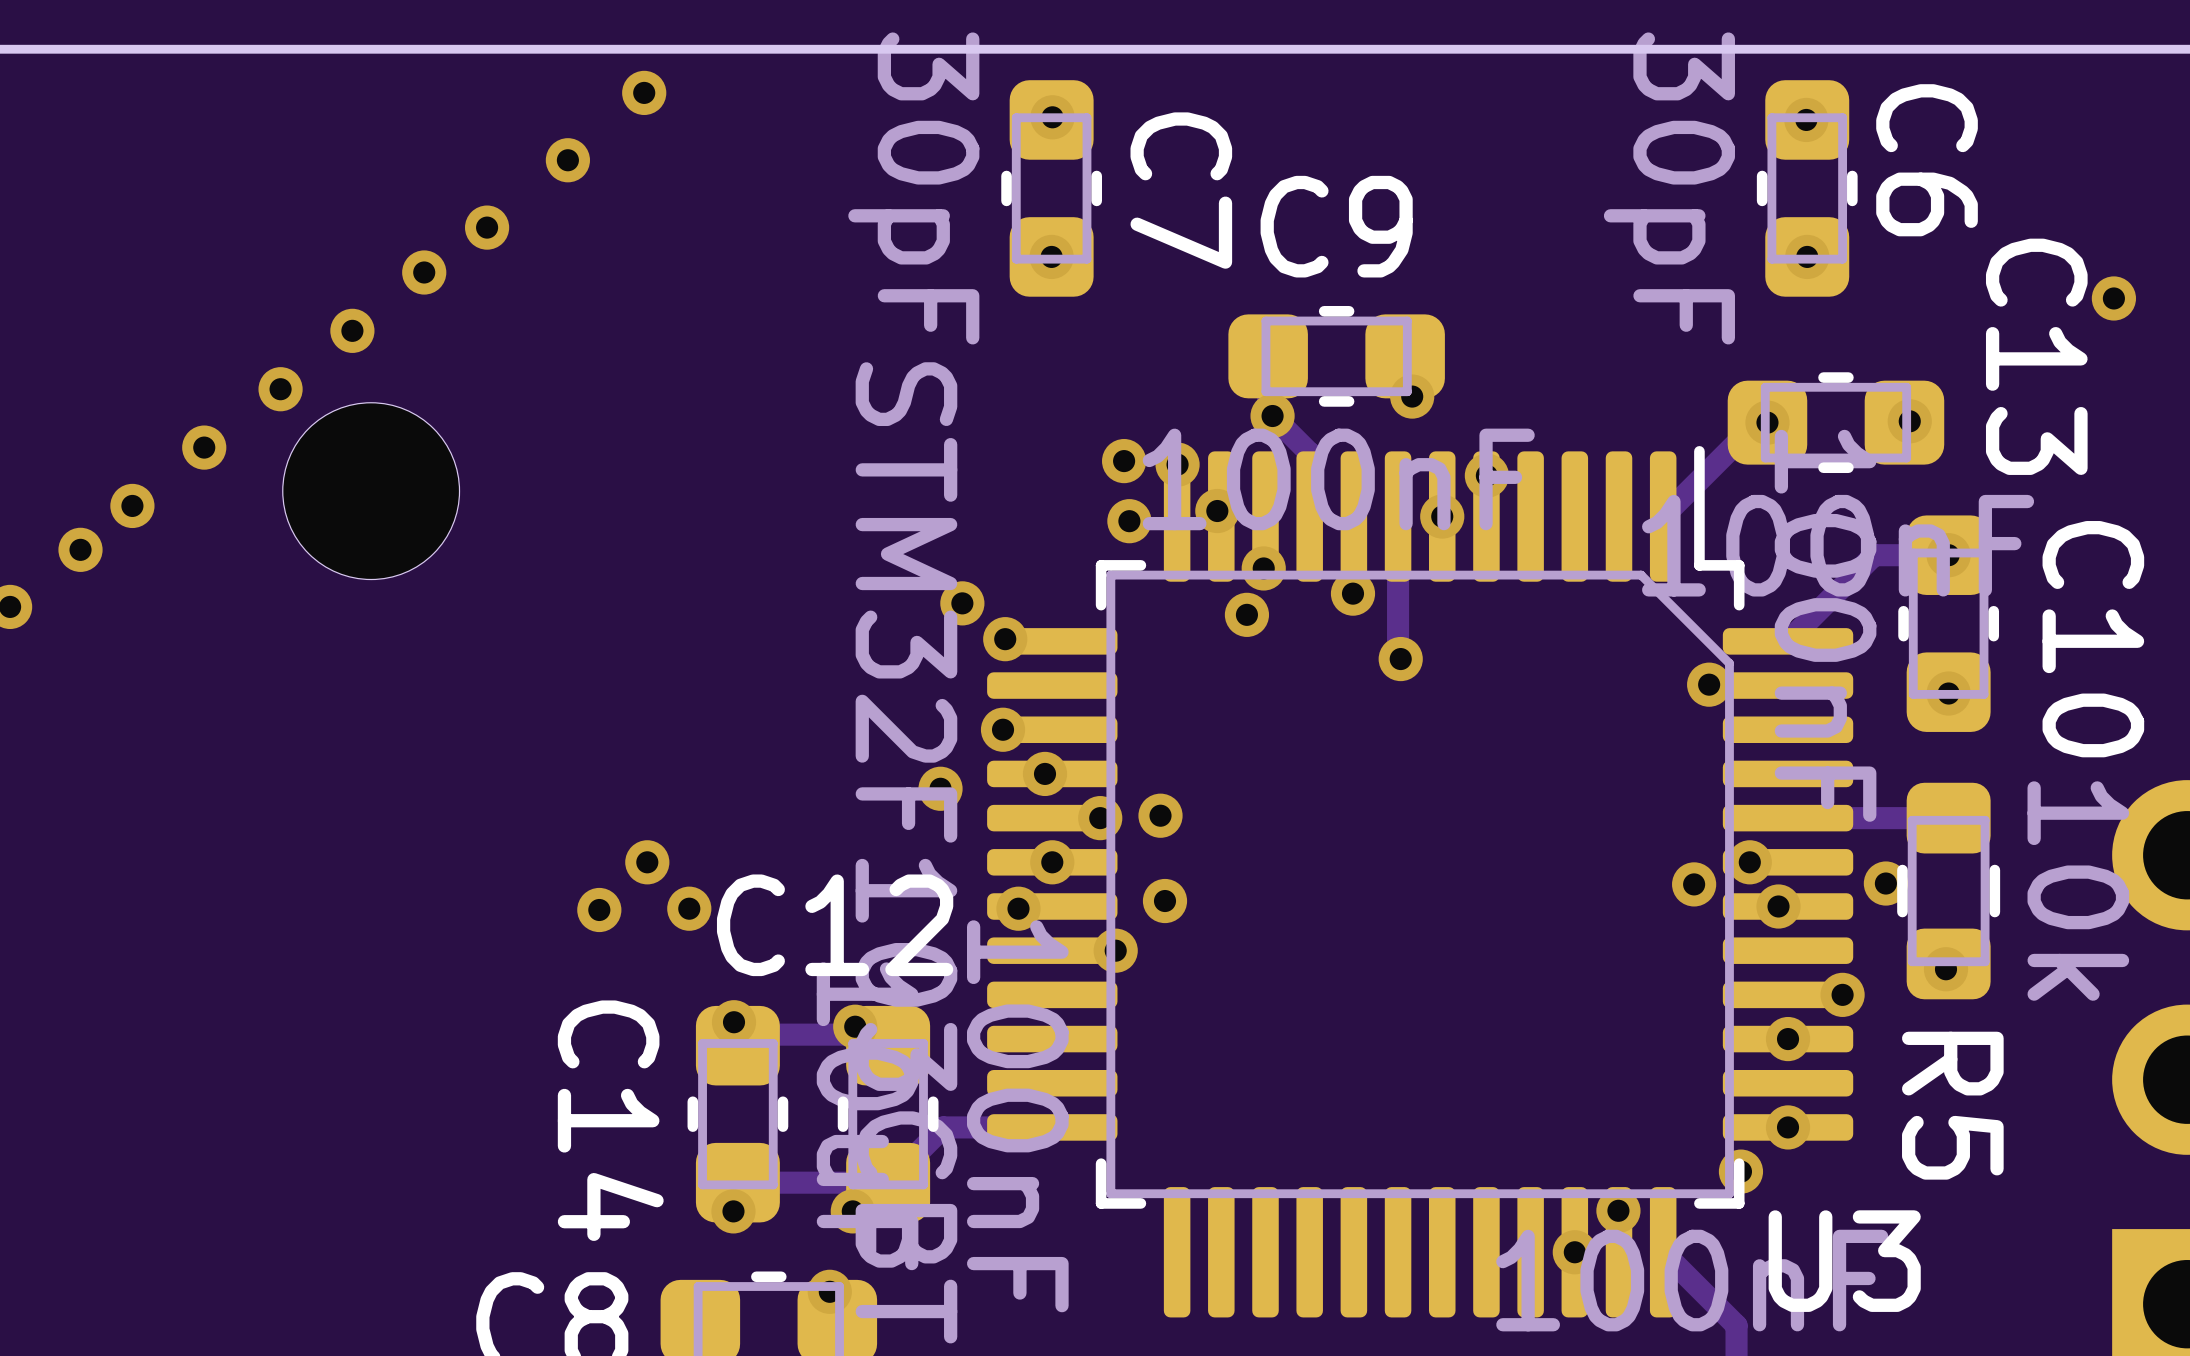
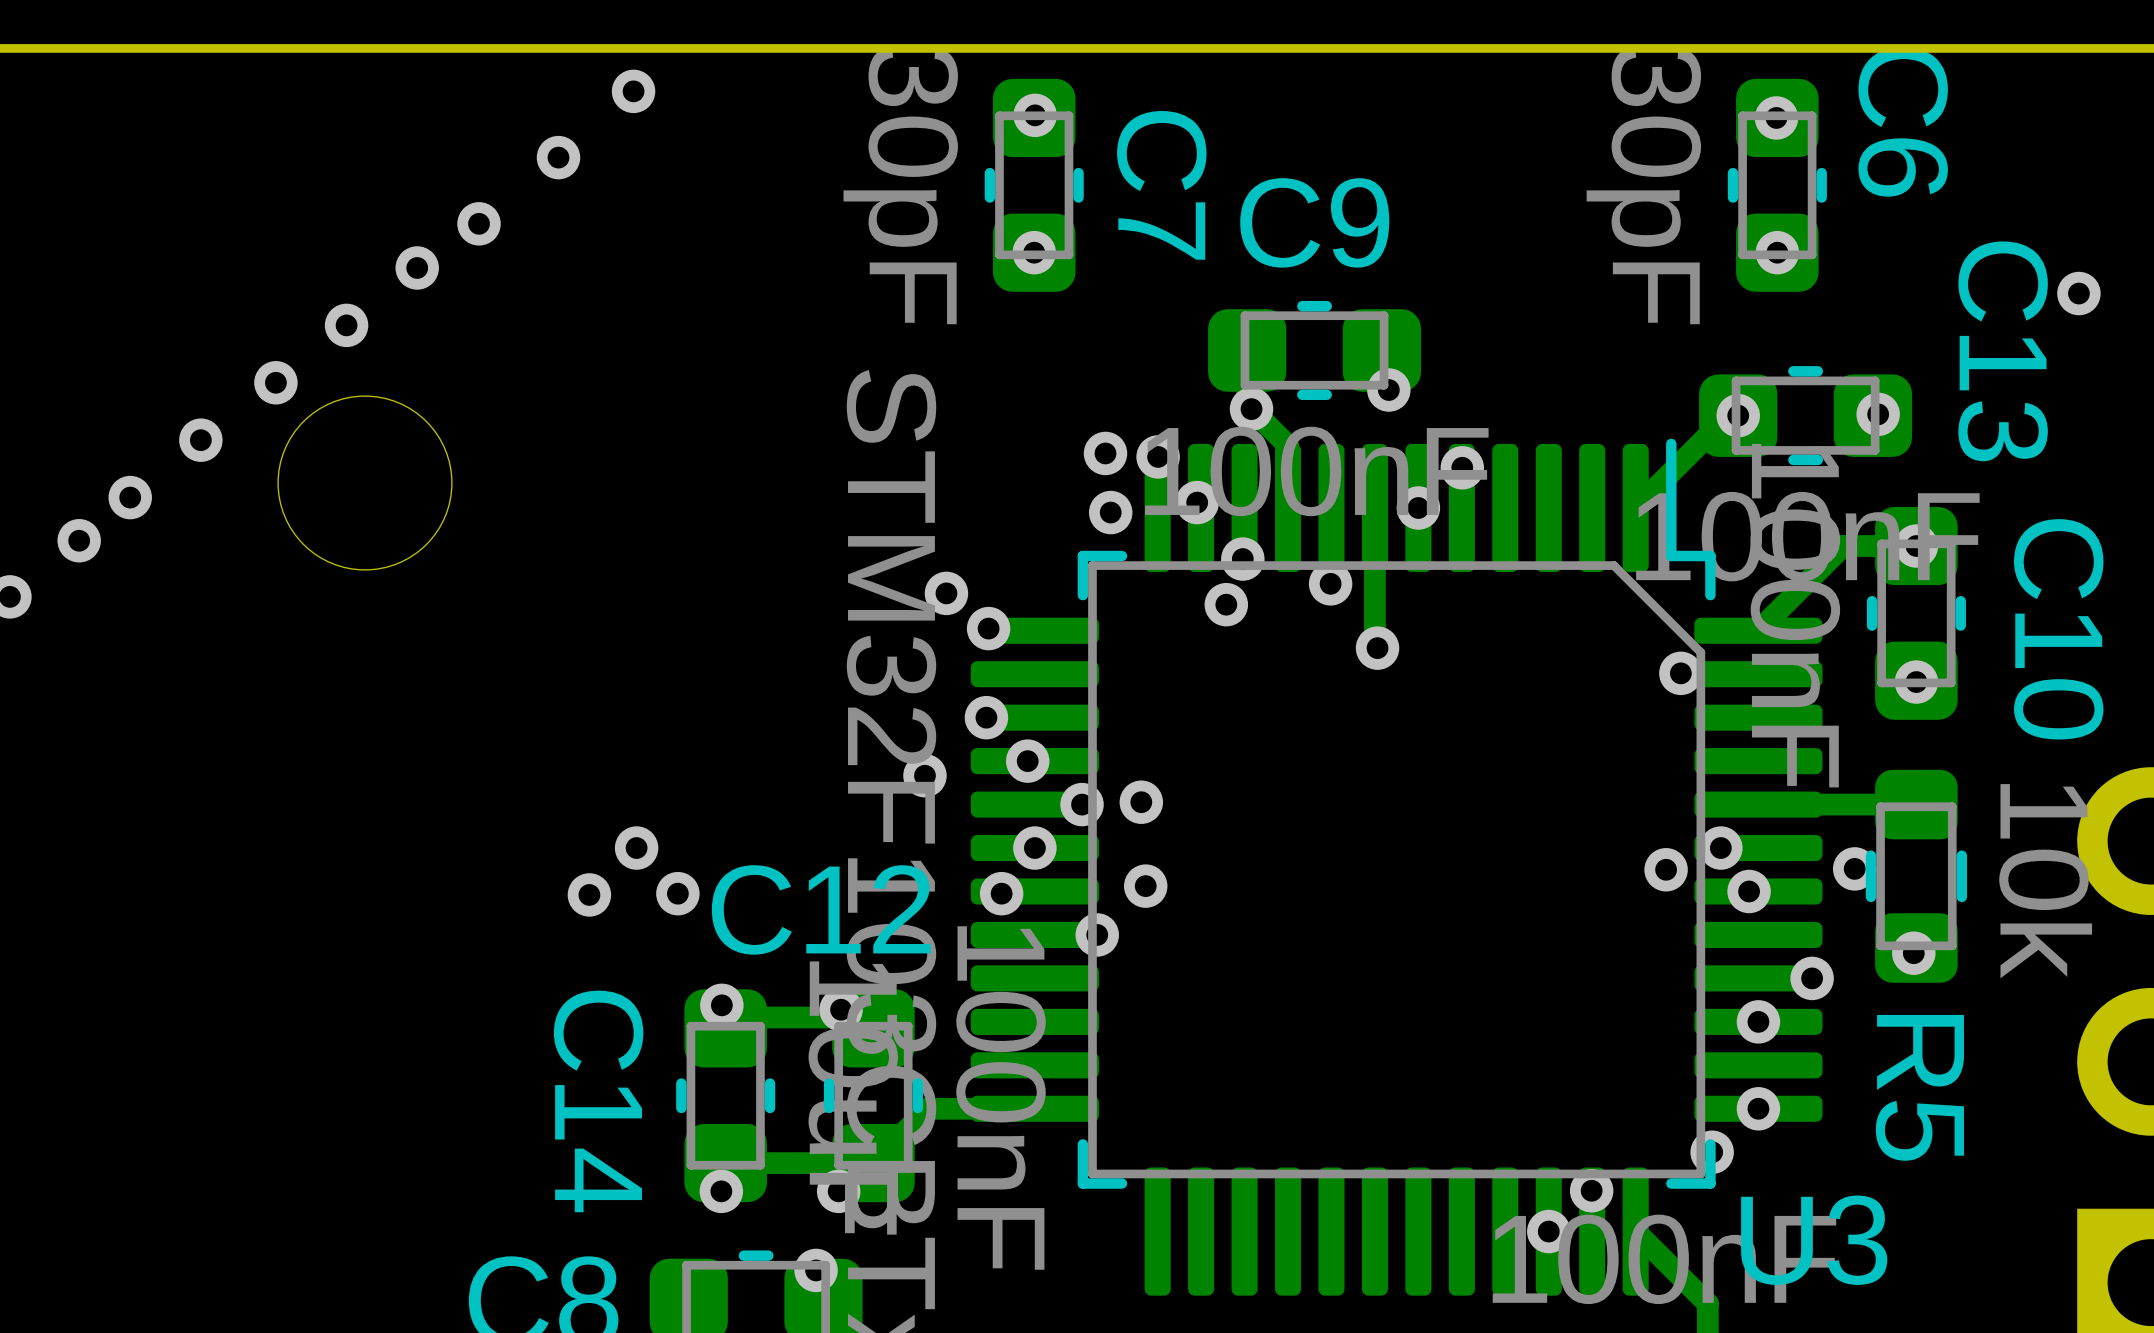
C6 name position: C6 (1927, 160) -> C6 (1903, 121)

